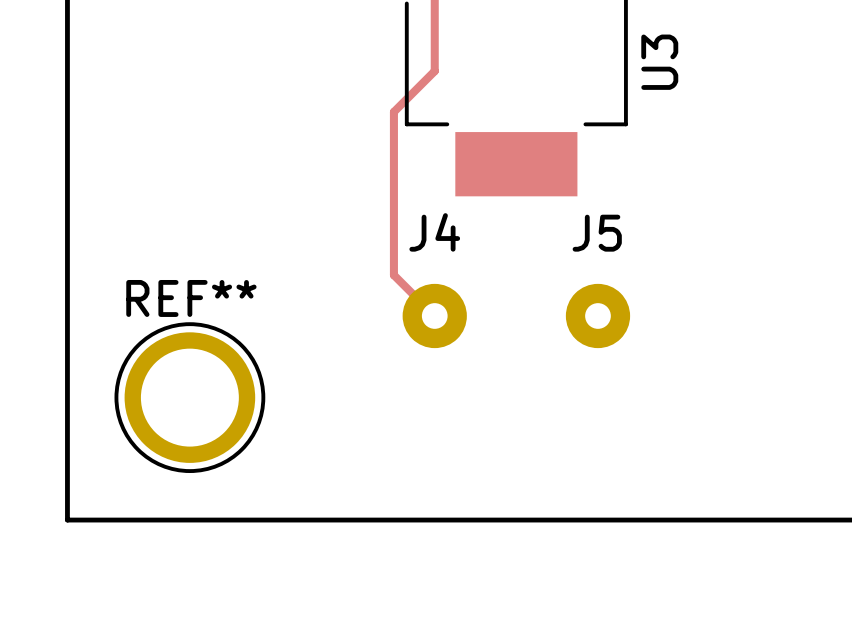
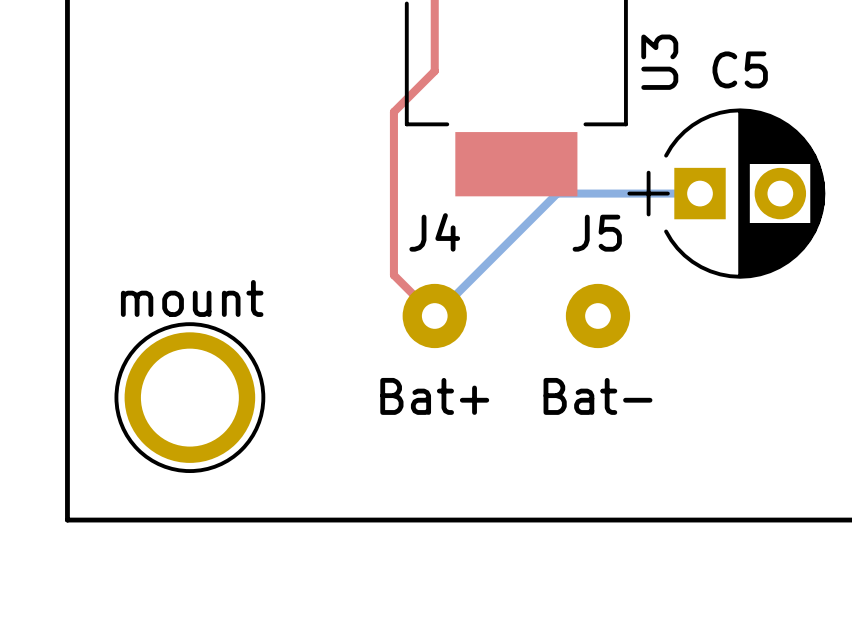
bottom track: none -> (700, 193) (557, 193) (434, 315)
C5: none -> (726, 193)
REF** name: REF** (191, 298) -> mount (192, 298)
J4 value: none -> Bat+ (434, 396)
J5 value: none -> Bat- (597, 396)

